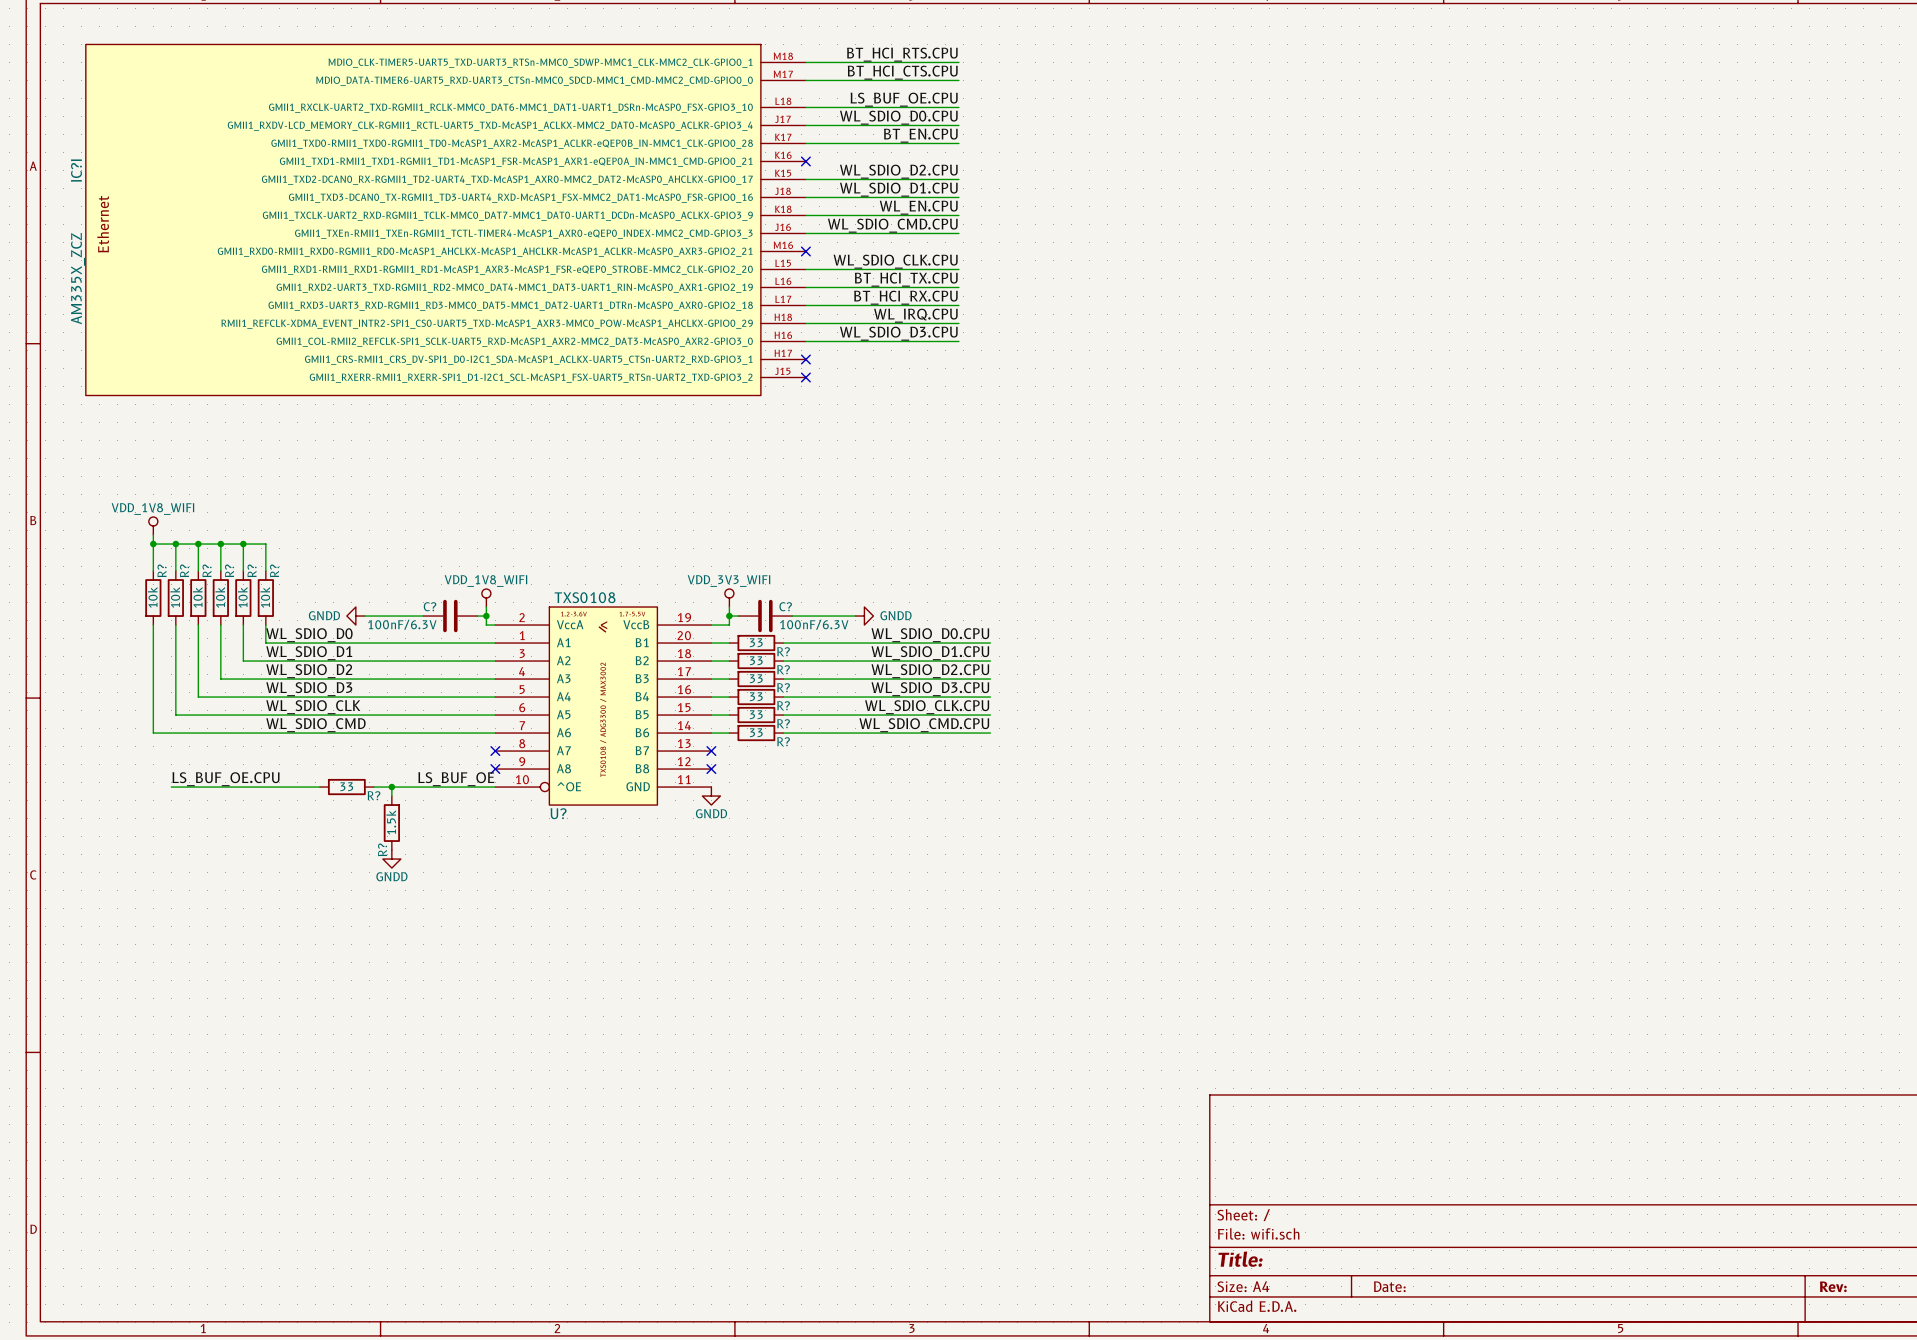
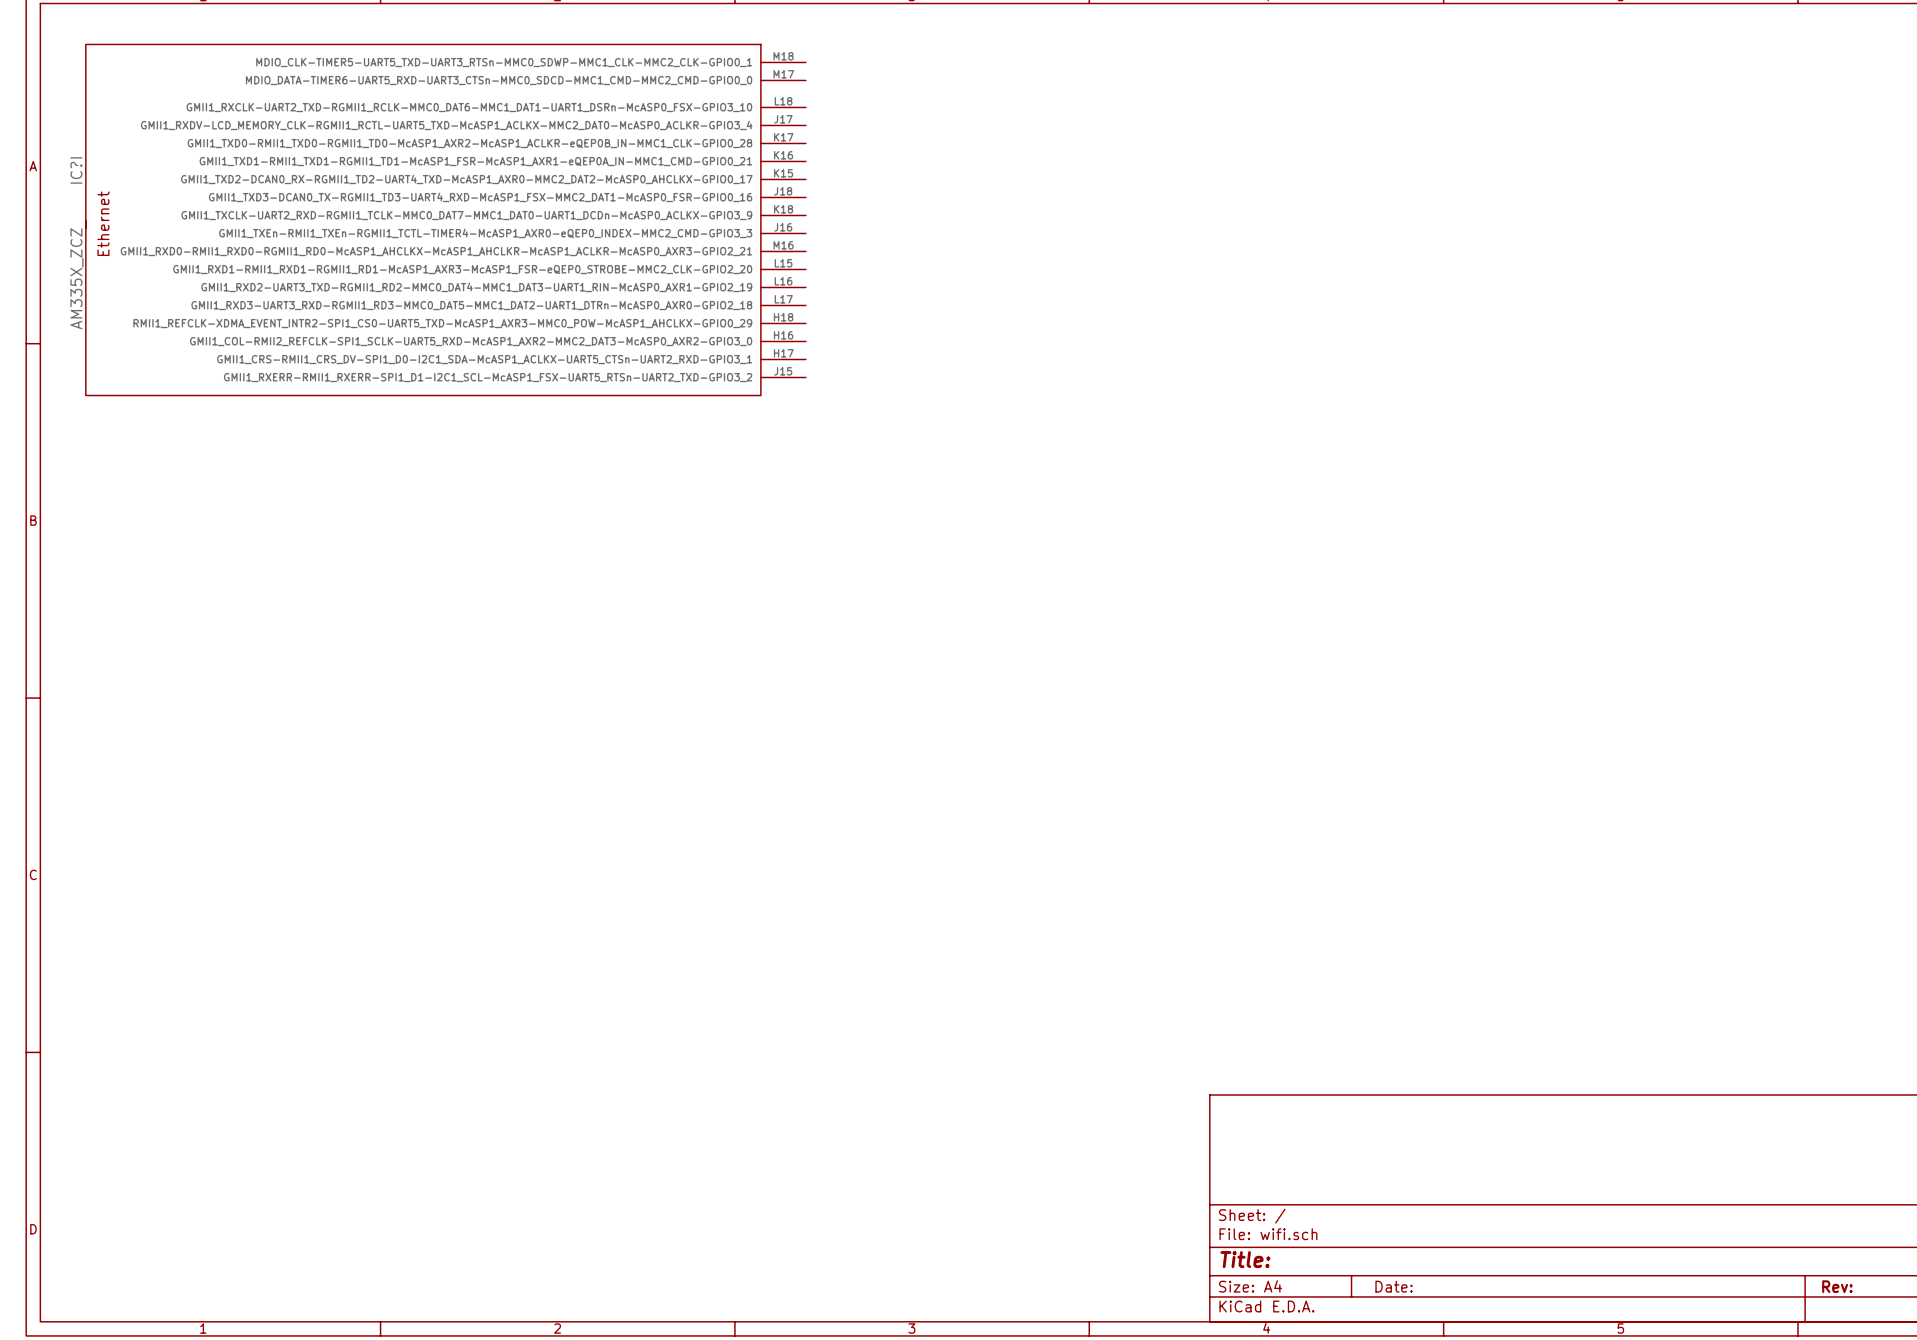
label: BT_HCI_RTS.CPU (902, 54) -> none
wire: (805, 62) (958, 62) -> none
label: BT_HCI_CTS.CPU (902, 72) -> none
wire: (805, 80) (958, 80) -> none
label: LS_BUF_OE.CPU (904, 99) -> none
wire: (805, 107) (958, 107) -> none
label: WL_SDIO_D0.CPU (898, 117) -> none
wire: (805, 125) (958, 125) -> none
label: BT_EN.CPU (920, 135) -> none
wire: (805, 143) (958, 143) -> none
no-connect mark: (805, 161) -> none
label: WL_SDIO_D2.CPU (898, 171) -> none
wire: (805, 179) (958, 179) -> none
label: WL_SDIO_D1.CPU (898, 189) -> none
wire: (805, 197) (958, 197) -> none
label: WL_EN.CPU (918, 207) -> none
wire: (805, 215) (958, 215) -> none
label: WL_SDIO_CMD.CPU (892, 225) -> none
wire: (805, 233) (958, 233) -> none
no-connect mark: (805, 251) -> none
label: WL_SDIO_CLK.CPU (895, 261) -> none
wire: (805, 269) (958, 269) -> none
label: BT_HCI_TX.CPU (906, 279) -> none
wire: (805, 287) (958, 287) -> none
label: BT_HCI_RX.CPU (905, 297) -> none
wire: (805, 305) (958, 305) -> none
label: WL_IRQ.CPU (915, 315) -> none
wire: (805, 323) (958, 323) -> none
label: WL_SDIO_D3.CPU (898, 333) -> none
wire: (805, 341) (958, 341) -> none
no-connect mark: (805, 359) -> none
no-connect mark: (805, 377) -> none
power symbol: VDD_1V8_WIFI (153, 526) -> none
wire: (153, 535) (153, 571) -> none
wire: (153, 544) (265, 544) (265, 571) -> none
junction: (153, 544) -> none
wire: (175, 544) (175, 571) -> none
junction: (175, 544) -> none
wire: (198, 544) (198, 571) -> none
junction: (198, 544) -> none
wire: (220, 544) (220, 571) -> none
junction: (220, 544) -> none
wire: (243, 544) (243, 571) -> none
junction: (243, 544) -> none
R?: 10k (153, 598) -> none
R?: 10k (175, 598) -> none
R?: 10k (198, 598) -> none
R?: 10k (220, 598) -> none
R?: 10k (243, 598) -> none
R?: 10k (265, 598) -> none
power symbol: VDD_1V8_WIFI (486, 598) -> none
power symbol: VDD_3V3_WIFI (729, 598) -> none
wire: (486, 607) (486, 625) (495, 625) -> none
wire: (729, 607) (729, 625) (711, 625) -> none
power symbol: GNDD (355, 616) -> none
wire: (364, 616) (423, 616) -> none
C?: 100nF/6.3V (450, 616) -> none
wire: (477, 616) (486, 616) -> none
junction: (486, 616) -> none
wire: (729, 616) (738, 616) -> none
junction: (729, 616) -> none
C?: 100nF/6.3V (765, 616) -> none
wire: (792, 616) (855, 616) -> none
power symbol: GNDD (864, 616) -> none
wire: (153, 625) (153, 733) (495, 733) -> none
wire: (175, 625) (175, 715) (495, 715) -> none
wire: (198, 625) (198, 697) (495, 697) -> none
wire: (220, 625) (220, 679) (495, 679) -> none
wire: (243, 625) (243, 661) (495, 661) -> none
wire: (265, 625) (265, 643) (495, 643) -> none
label: WL_SDIO_D0 (309, 635) -> none
label: WL_SDIO_D0.CPU (930, 635) -> none
wire: (711, 643) (729, 643) -> none
R?: 33 (756, 643) -> none
wire: (783, 643) (990, 643) -> none
label: WL_SDIO_D1 (309, 653) -> none
label: WL_SDIO_D1.CPU (930, 653) -> none
wire: (711, 661) (729, 661) -> none
R?: 33 (756, 661) -> none
wire: (783, 661) (990, 661) -> none
label: WL_SDIO_D2 (309, 671) -> none
label: WL_SDIO_D2.CPU (930, 671) -> none
wire: (711, 679) (729, 679) -> none
R?: 33 (756, 679) -> none
wire: (783, 679) (990, 679) -> none
label: WL_SDIO_D3 (309, 689) -> none
label: WL_SDIO_D3.CPU (930, 689) -> none
wire: (711, 697) (729, 697) -> none
R?: 33 (756, 697) -> none
wire: (783, 697) (990, 697) -> none
U?: TXS0108 (603, 706) -> none
label: WL_SDIO_CLK (313, 707) -> none
label: WL_SDIO_CLK.CPU (927, 707) -> none
wire: (711, 715) (729, 715) -> none
R?: 33 (756, 715) -> none
wire: (783, 715) (990, 715) -> none
label: WL_SDIO_CMD (315, 725) -> none
label: WL_SDIO_CMD.CPU (924, 725) -> none
wire: (711, 733) (729, 733) -> none
R?: 33 (756, 733) -> none
wire: (783, 733) (990, 733) -> none
no-connect mark: (495, 751) -> none
no-connect mark: (711, 751) -> none
no-connect mark: (495, 769) -> none
no-connect mark: (711, 769) -> none
label: LS_BUF_OE.CPU (225, 779) -> none
label: LS_BUF_OE (456, 779) -> none
wire: (171, 787) (319, 787) -> none
R?: 33 (346, 787) -> none
wire: (373, 787) (495, 787) -> none
wire: (391, 787) (391, 796) -> none
junction: (391, 787) -> none
power symbol: GNDD (711, 796) -> none
R?: 1.5k (391, 823) -> none
power symbol: GNDD (391, 859) -> none

